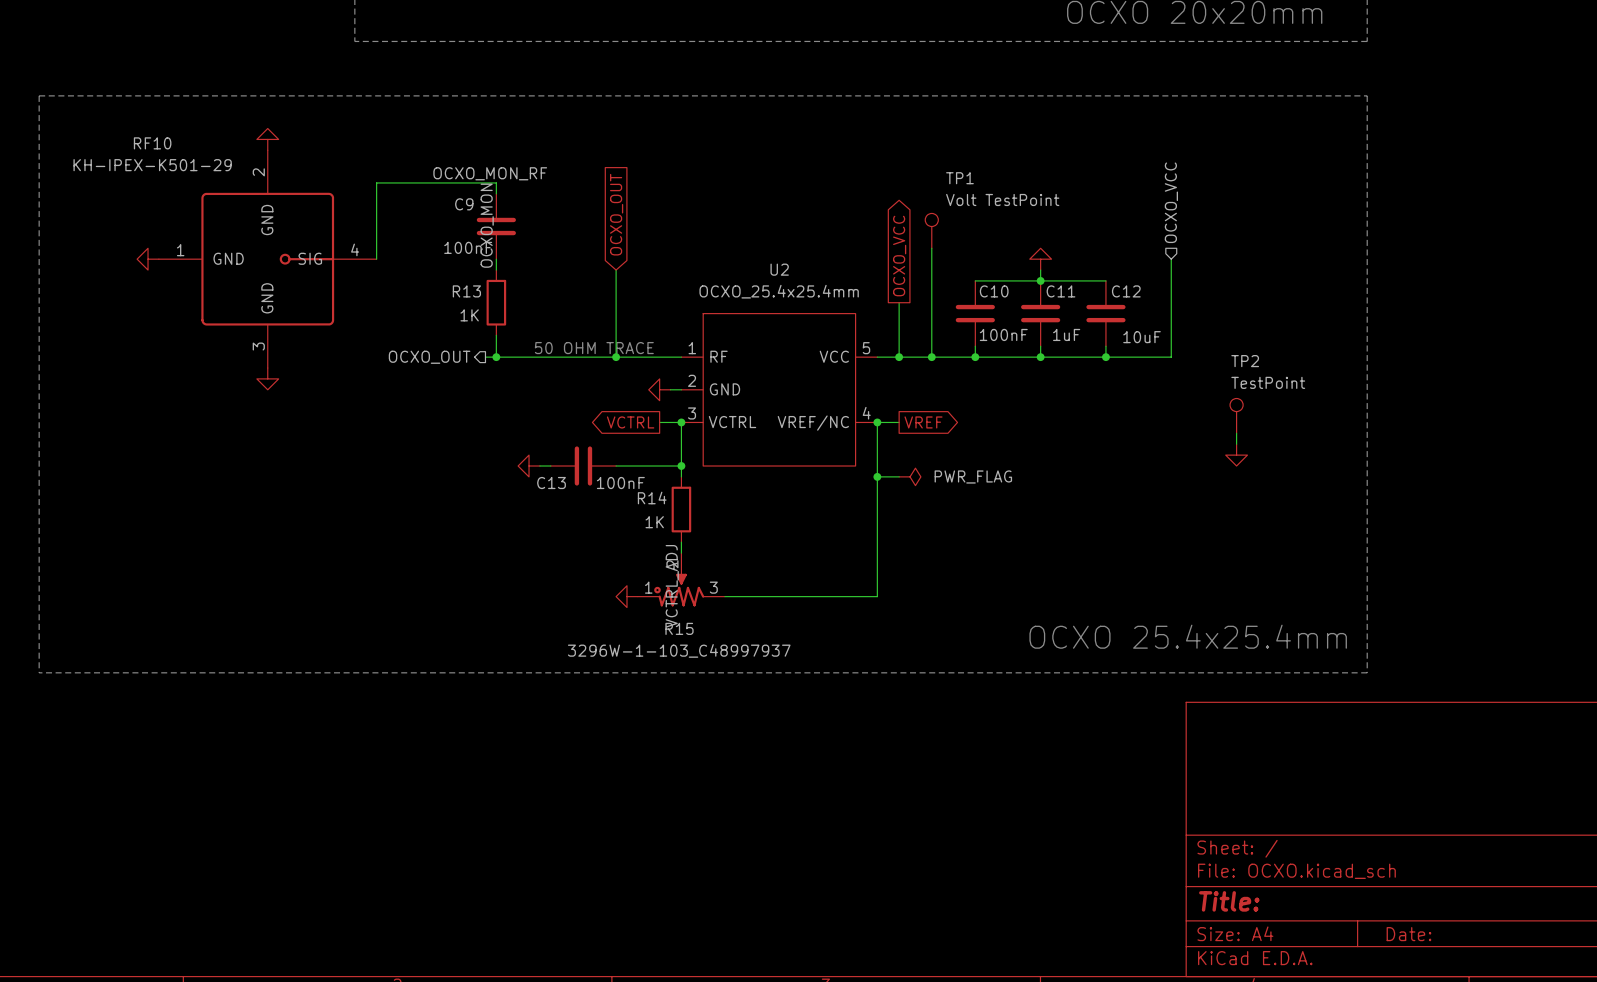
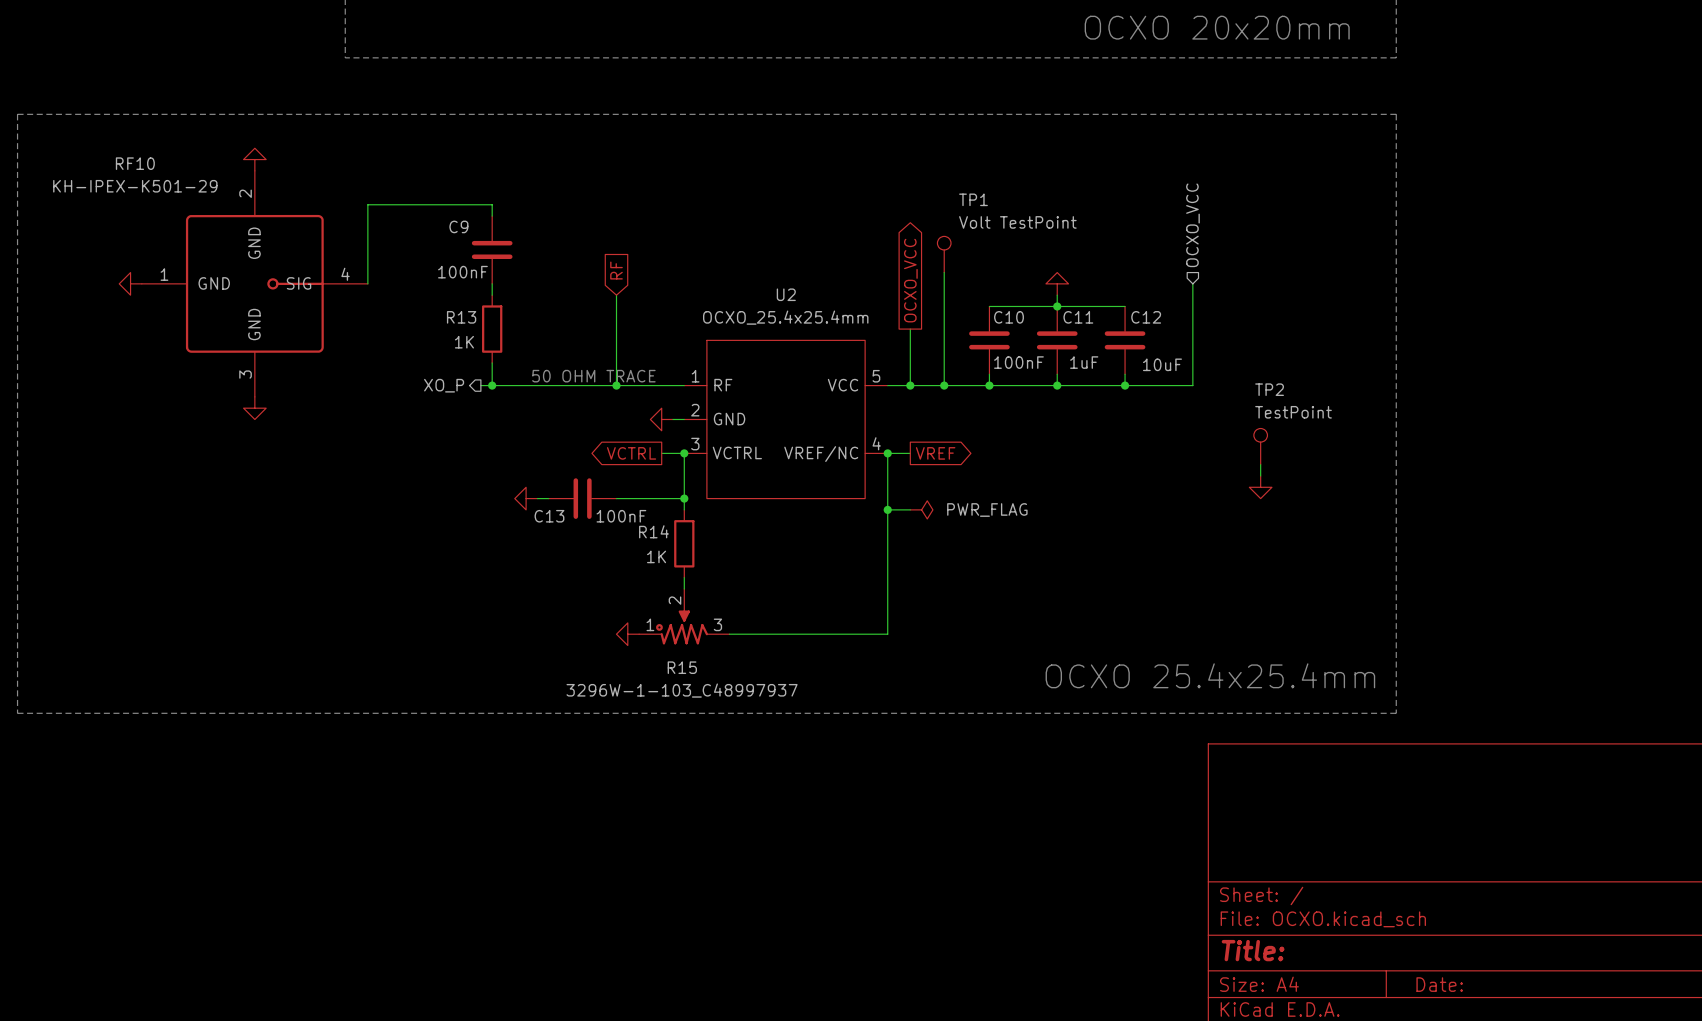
label: OCXO_MON_RF (490, 173) -> none
global label: OCXO_OUT (616, 214) -> RF (616, 270)
label: OCXO_MON (487, 225) -> none
hierarchical label: OCXO_OUT (429, 357) -> XO_P (444, 385)
label: VCTRL_ADJ (672, 586) -> none

